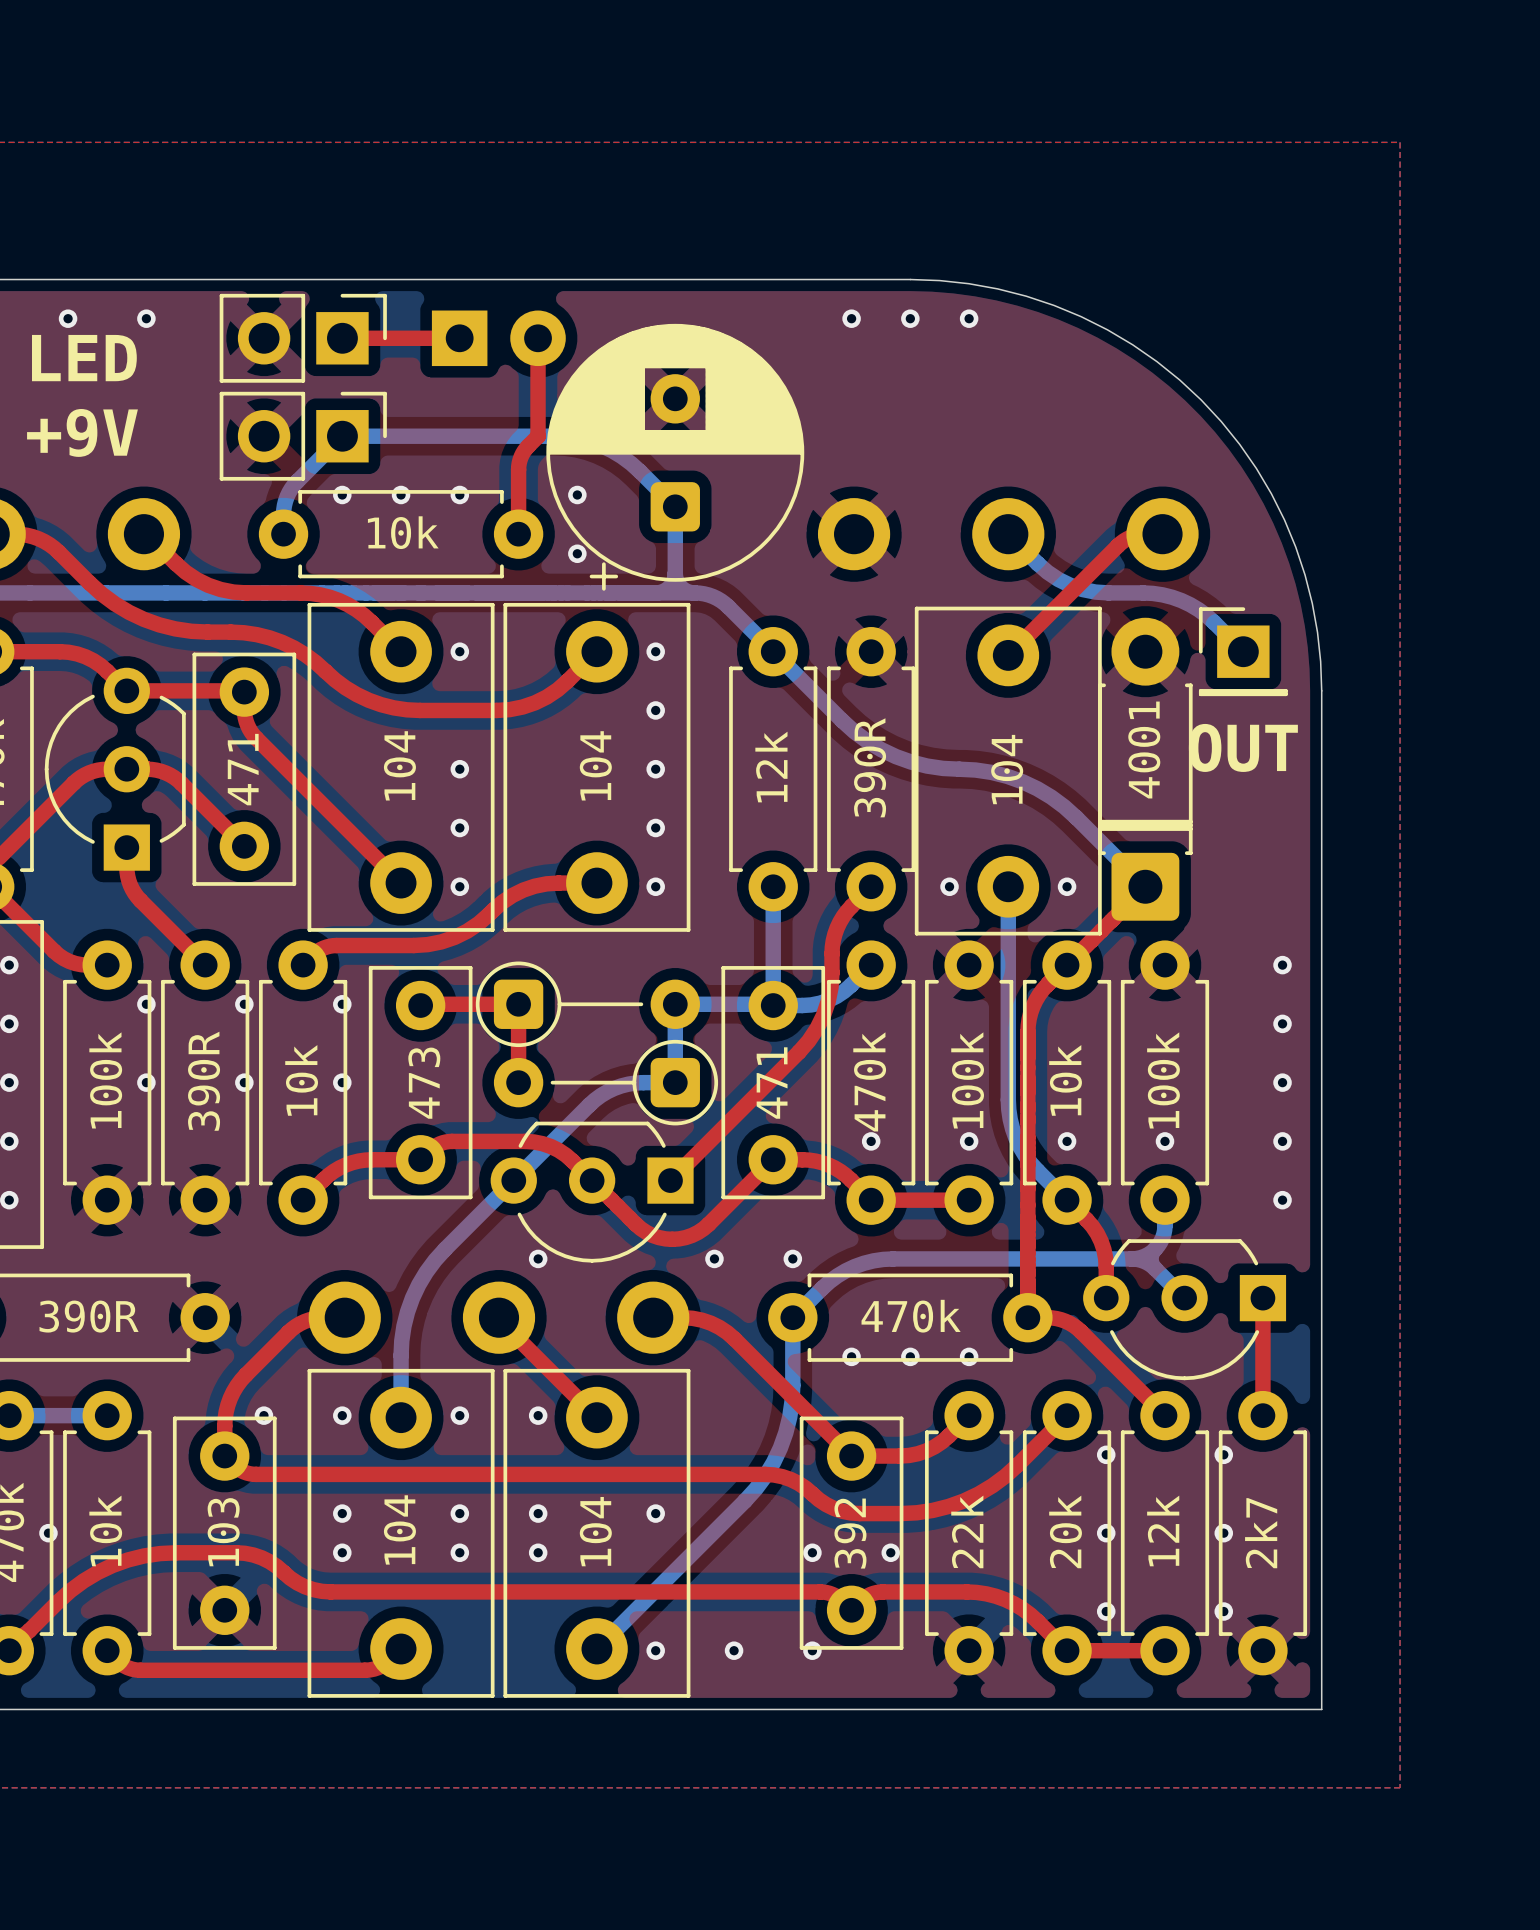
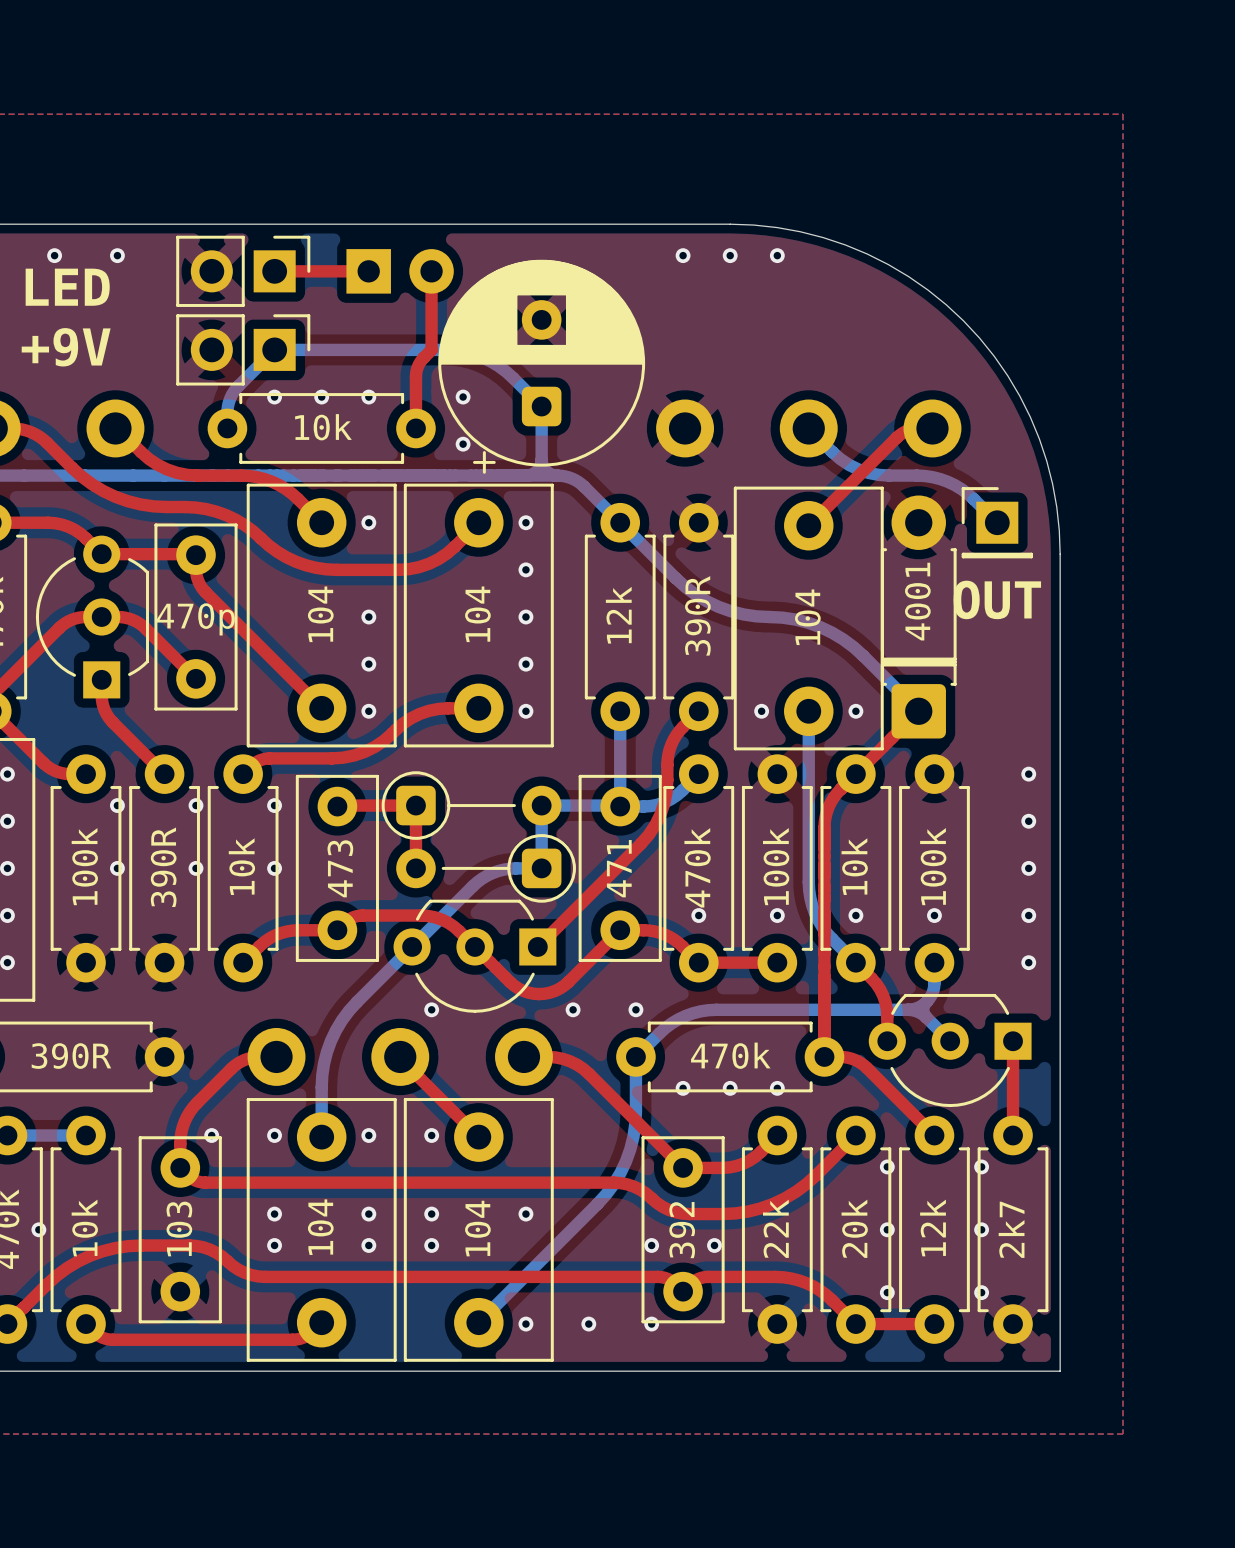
part value: 471 (243, 769) -> 470p (195, 619)

